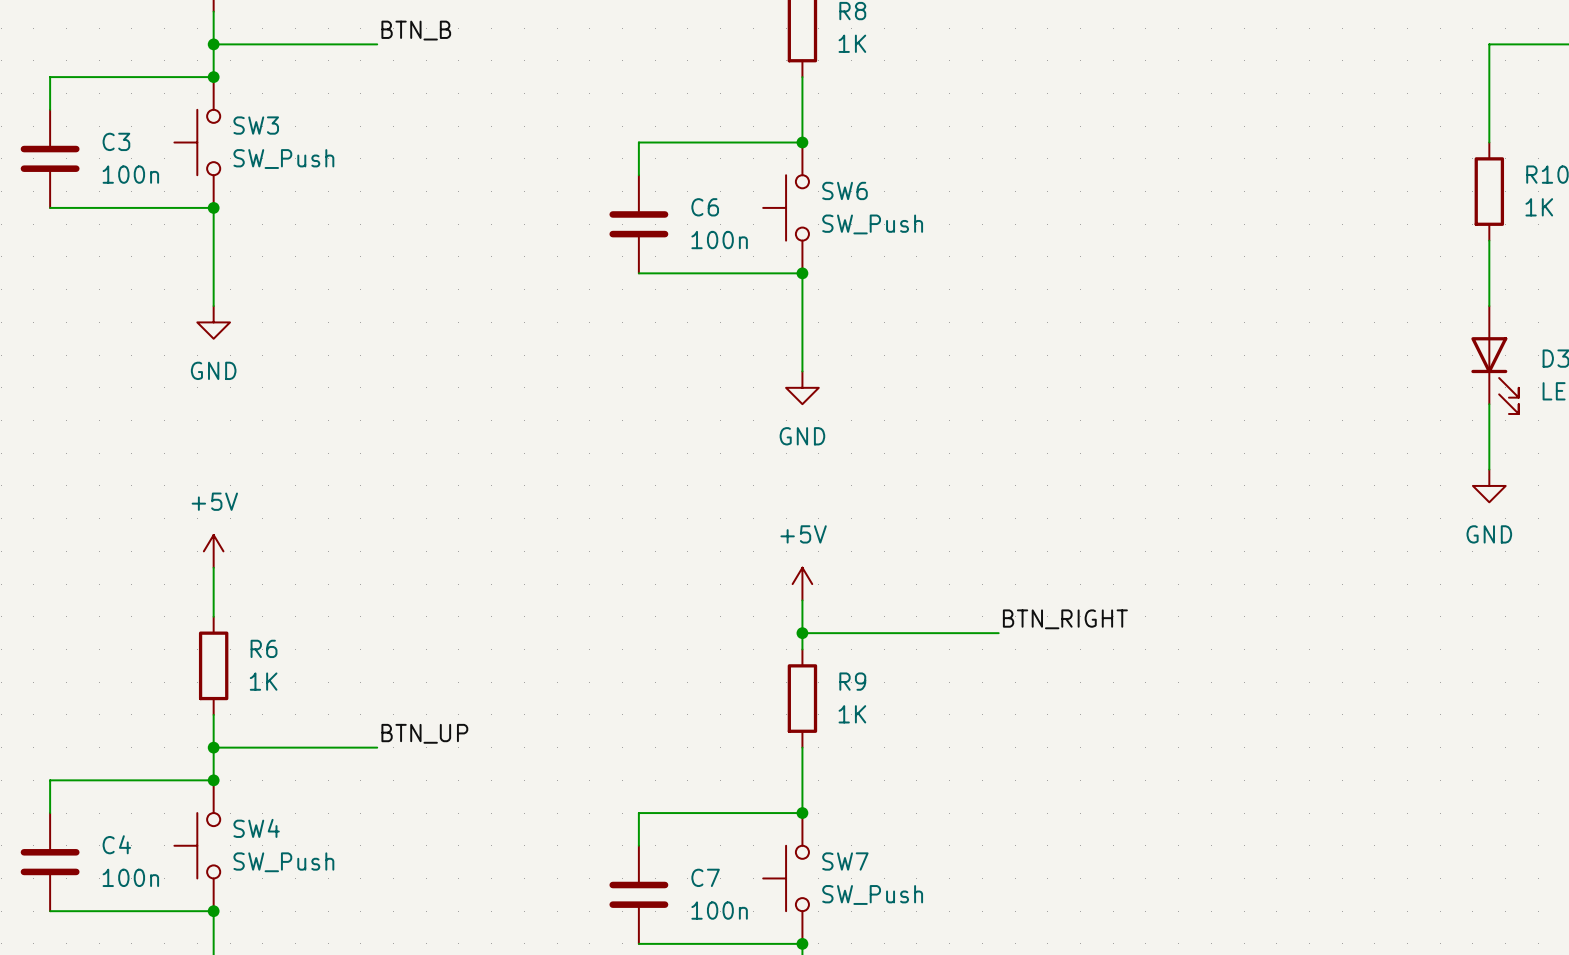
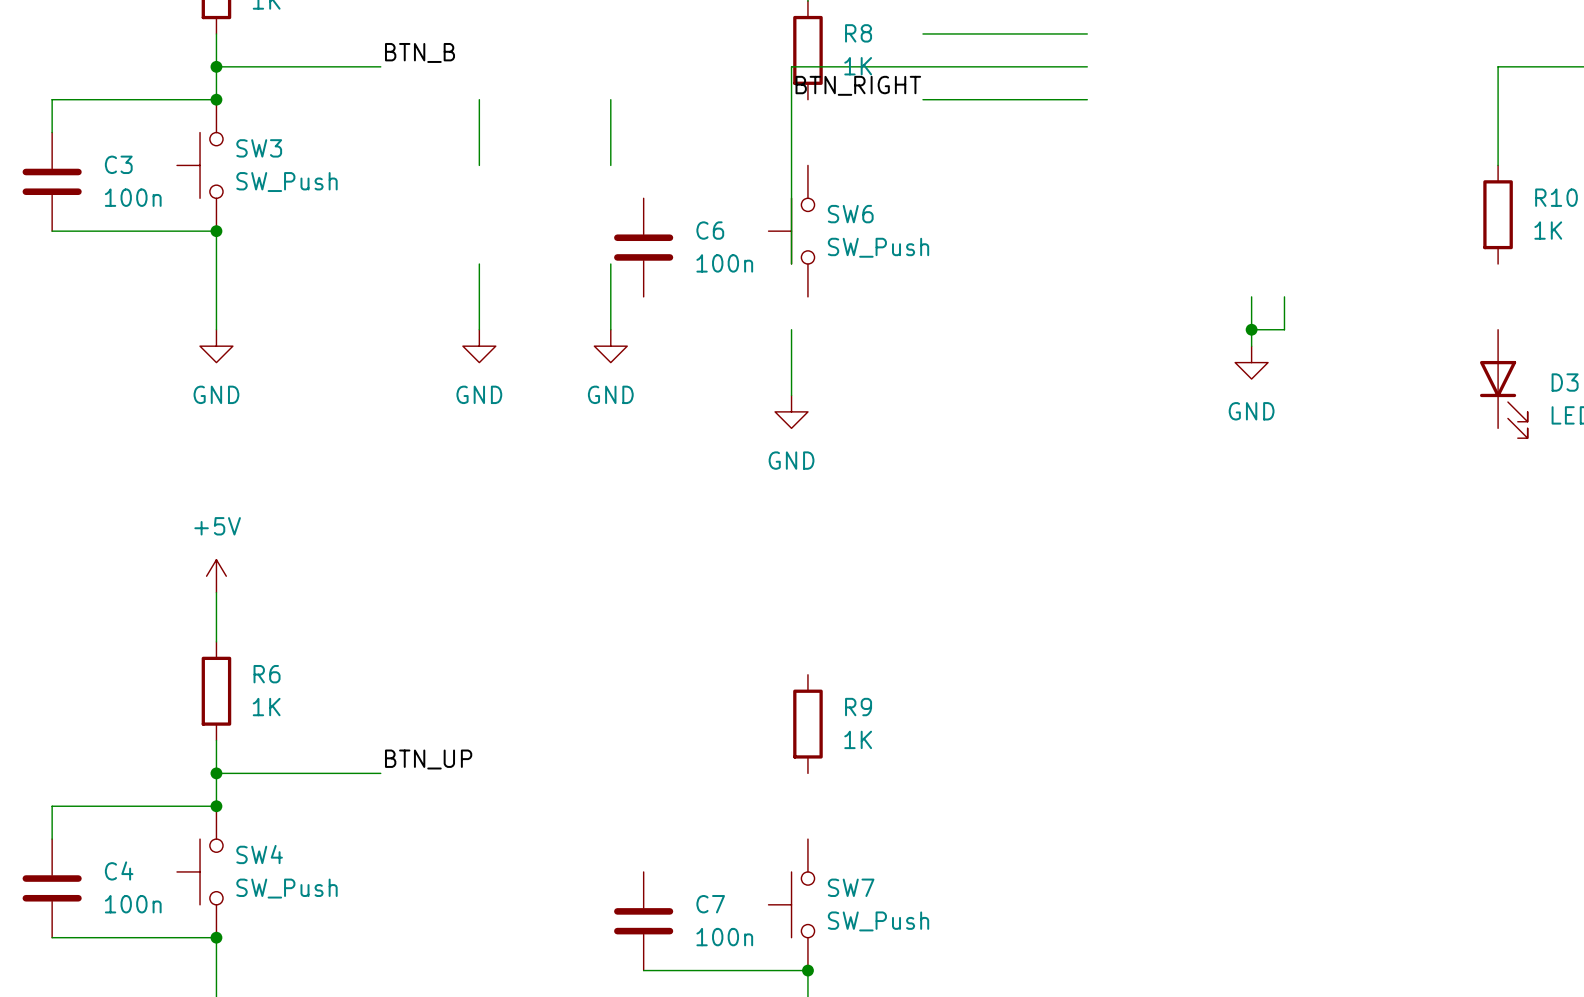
wire: none -> (922, 33) (1087, 33)
wire: none -> (1087, 66) (791, 66) (791, 264)
label: none -> BTN_RIGHT (858, 85)
wire: none -> (479, 99) (479, 165)
wire: none -> (610, 99) (610, 165)
wire: (802, 77) (802, 142) (638, 142) (638, 175) -> none
wire: none -> (922, 99) (1087, 99)
junction: (802, 142) -> none
wire: none -> (479, 264) (479, 329)
wire: none -> (610, 264) (610, 329)
wire: (1489, 240) (1489, 306) -> none
wire: (638, 273) (802, 273) (802, 371) -> none
junction: (802, 273) -> none
wire: none -> (1251, 296) (1251, 346)
wire: none -> (1284, 296) (1284, 329) (1251, 329)
wire: none -> (791, 329) (791, 395)
junction: none -> (1251, 329)
power symbol: none -> GND (479, 346)
power symbol: none -> GND (610, 346)
power symbol: none -> GND (1251, 362)
power symbol position: GND (802, 387) -> GND (791, 411)
wire: (1489, 404) (1489, 469) -> none
power symbol: GND (1489, 485) -> none
power symbol: +5V (802, 584) -> none
wire: (802, 600) (802, 649) -> none
label: BTN_RIGHT (1065, 619) -> none
wire: (802, 633) (998, 633) -> none
junction: (802, 633) -> none
wire: (802, 747) (802, 813) (638, 813) (638, 845) -> none
junction: (802, 813) -> none

